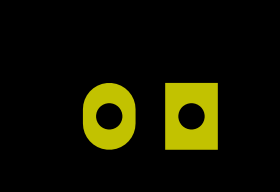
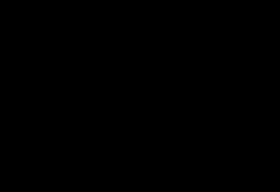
part: (150, 116) -> none

